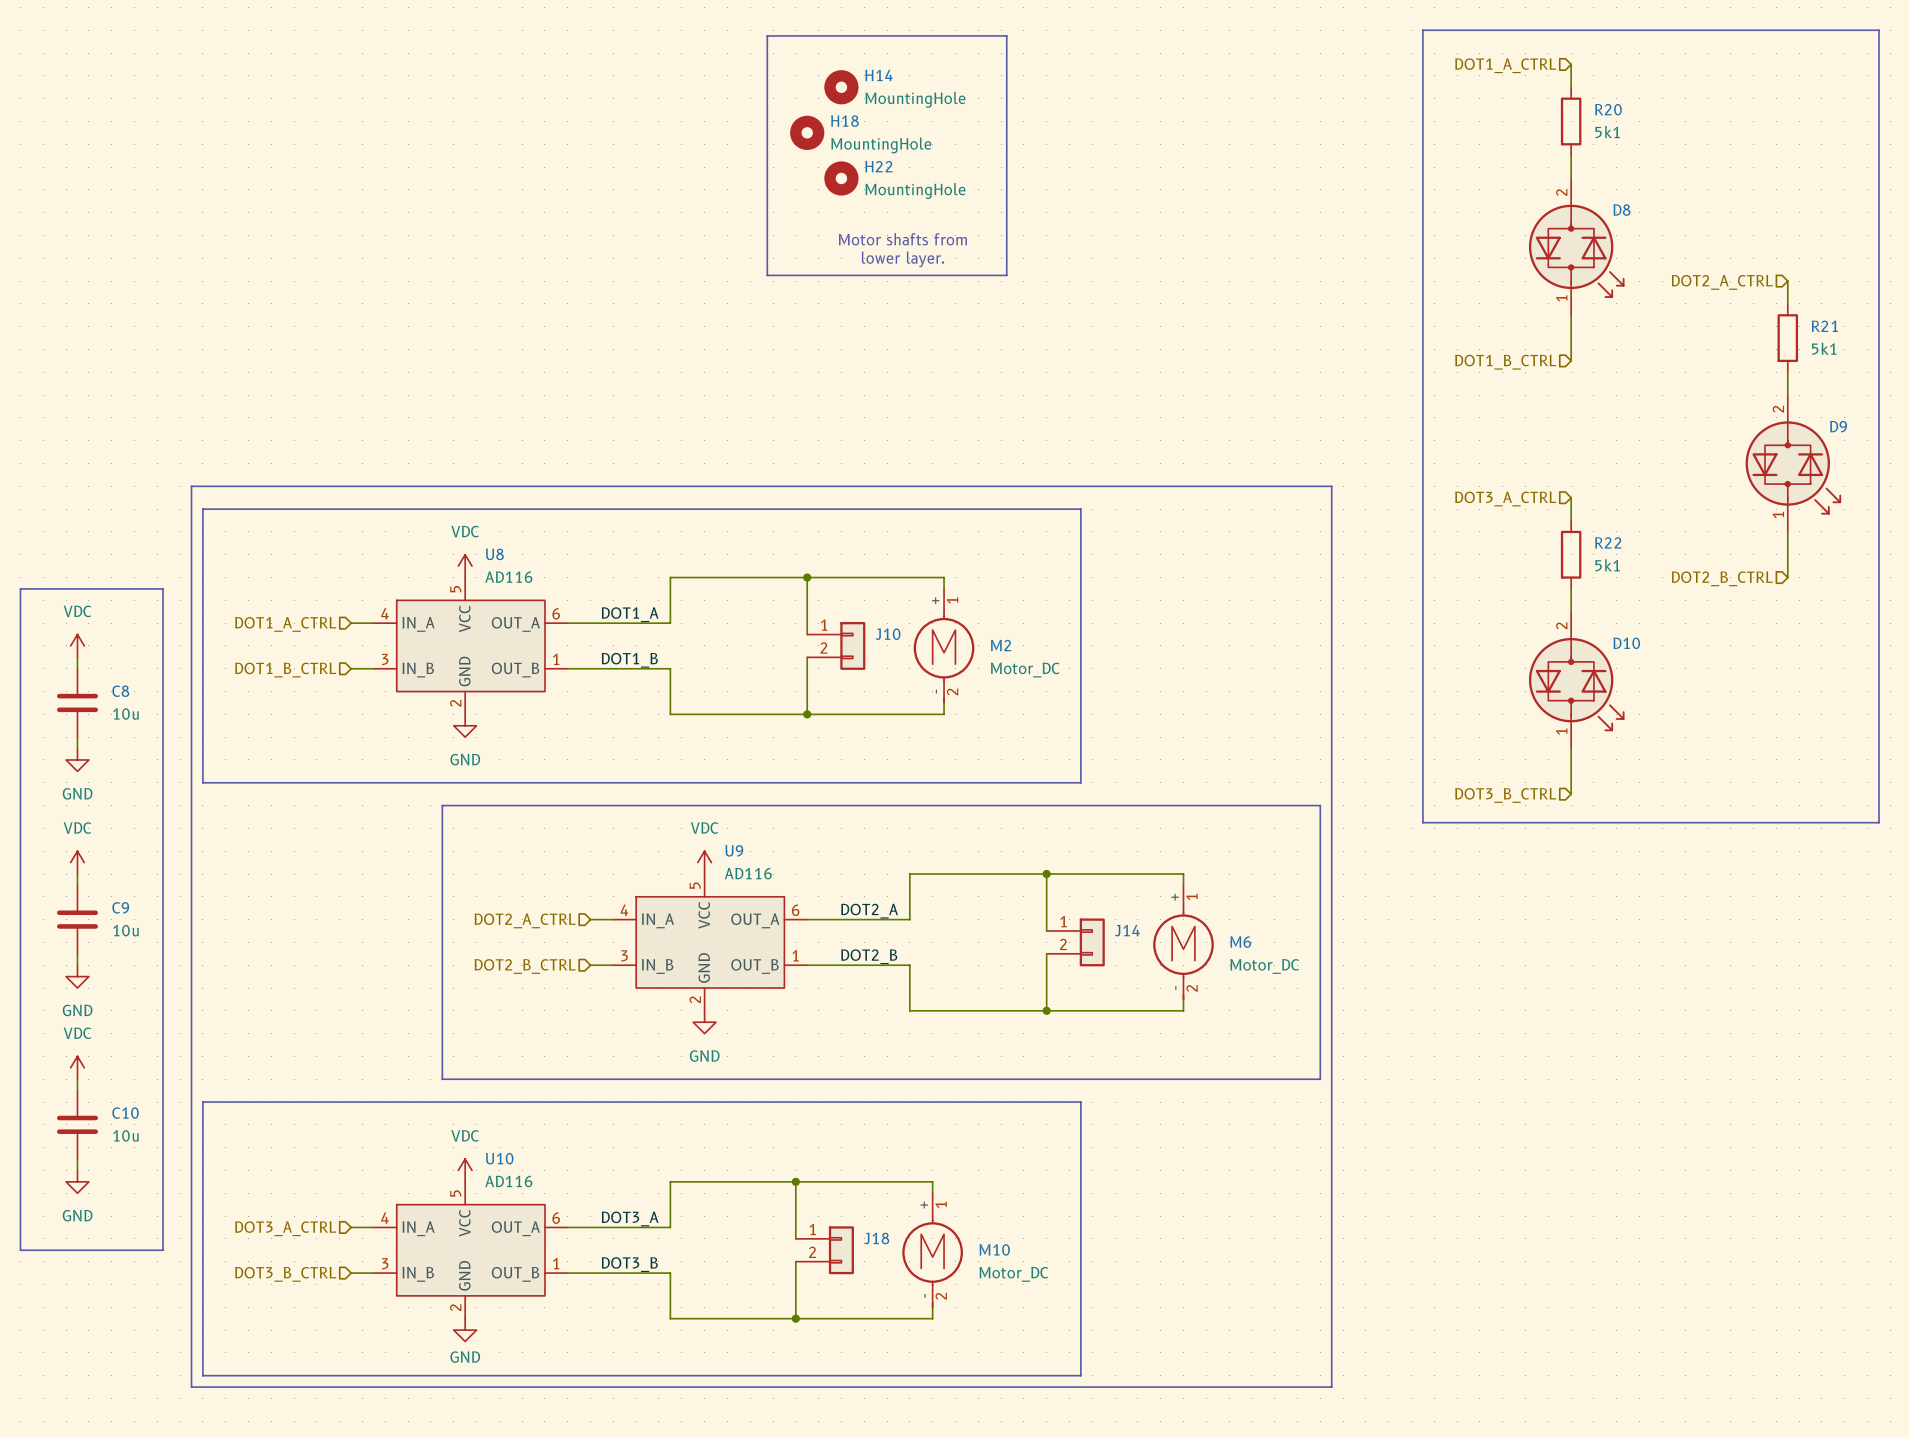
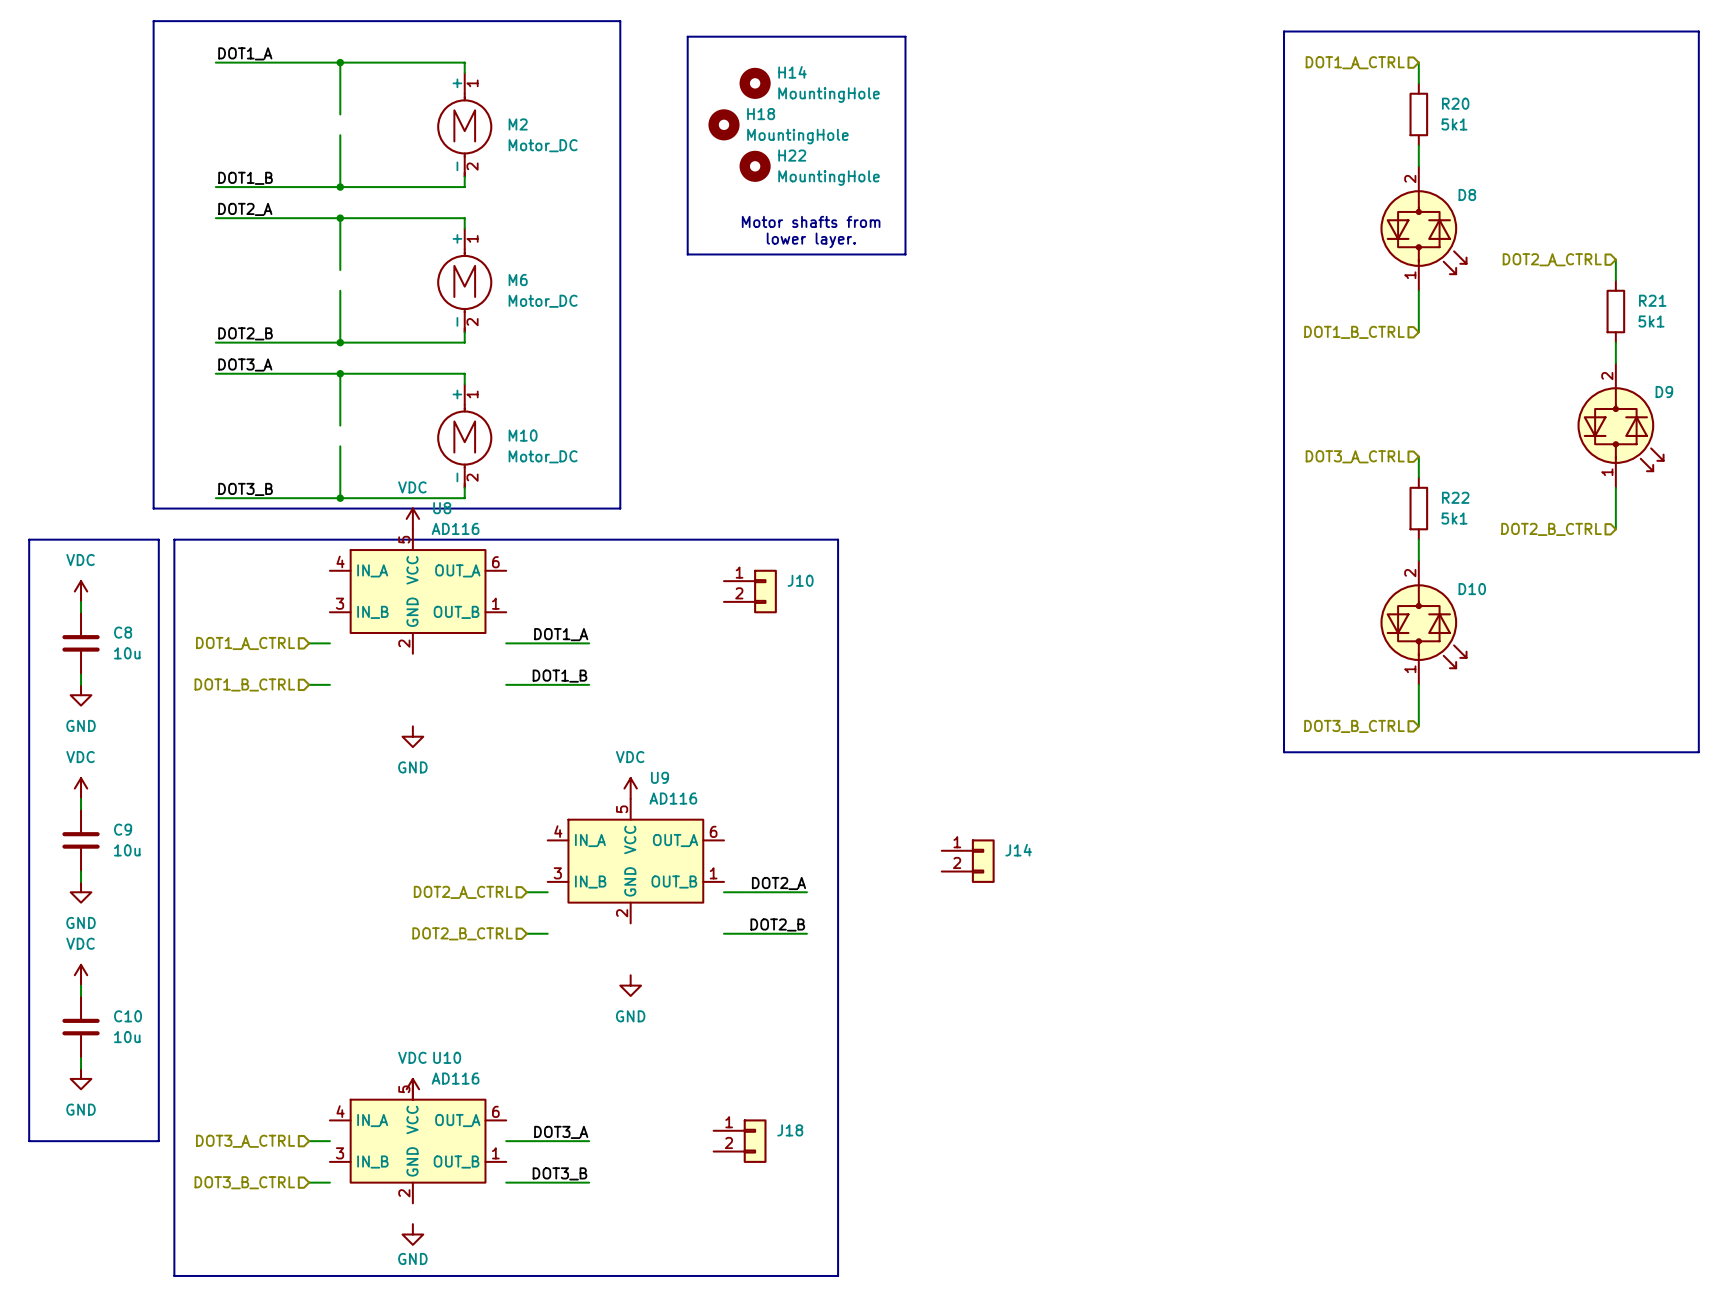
line: none -> (153, 21) (620, 21) (620, 508) (153, 508) (153, 21)
label: none -> DOT1_A (245, 53)
wire: none -> (215, 62) (464, 62) (464, 72)
wire: none -> (340, 62) (340, 114)
junction: none -> (340, 62)
wire: none -> (340, 135) (340, 187)
wire: none -> (464, 176) (464, 187) (215, 187)
label: none -> DOT1_B (245, 178)
junction: none -> (340, 187)
label: none -> DOT2_A (245, 209)
wire: none -> (215, 218) (464, 218) (464, 228)
wire: none -> (340, 218) (340, 270)
junction: none -> (340, 218)
wire: none -> (340, 290) (340, 342)
wire: none -> (464, 332) (464, 342) (215, 342)
label: none -> DOT2_B (245, 333)
junction: none -> (340, 342)
label: none -> DOT3_A (245, 364)
wire: none -> (215, 373) (464, 373) (464, 384)
wire: none -> (340, 373) (340, 425)
junction: none -> (340, 373)
line: (191, 486) (1331, 486) (1331, 1387) (191, 1387) (191, 486) -> none
wire: none -> (340, 446) (340, 498)
wire: none -> (464, 487) (464, 498) (215, 498)
label: none -> DOT3_B (245, 489)
junction: none -> (340, 498)
wire: (807, 577) (807, 634) -> none
junction: (807, 577) -> none
line: (43, 588) (20, 588) (20, 1250) (43, 1250) -> (29, 539) (29, 1141)
line: (163, 588) (163, 1250) -> (138, 539) (158, 539) (158, 1141) (138, 1141)
line: (202, 588) (202, 509) (1080, 509) (1080, 782) (202, 782) -> (174, 1006) (174, 715)
wire: (944, 588) (944, 577) (670, 577) (670, 623) (567, 623) -> none
label position: DOT1_A (630, 614) -> DOT1_A (561, 634)
wire: (351, 623) (373, 623) -> (309, 643) (329, 643)
hierarchical label position: DOT1_A_CTRL (285, 624) -> DOT1_A_CTRL (245, 643)
power symbol position: VDC (77, 645) -> VDC (81, 591)
M2 position: (944, 645) -> (464, 124)
wire: (77, 657) (77, 668) -> (81, 601) (81, 612)
wire: (807, 657) (807, 714) -> none
label position: DOT1_B (629, 660) -> DOT1_B (559, 676)
wire: (351, 668) (373, 668) -> (309, 684) (329, 684)
wire: (567, 668) (670, 668) (670, 714) (944, 714) (944, 702) -> none
hierarchical label position: DOT1_B_CTRL (285, 670) -> DOT1_B_CTRL (244, 684)
C8 position: (77, 702) -> (81, 643)
wire: none -> (506, 643) (589, 643)
junction: (807, 714) -> none
power symbol position: GND (465, 725) -> GND (412, 736)
wire: (77, 737) (77, 748) -> (81, 674) (81, 684)
wire: none -> (506, 684) (589, 684)
power symbol position: GND (77, 759) -> GND (81, 695)
line: (442, 805) (1320, 805) (1320, 1079) (442, 1079) (442, 805) -> none
power symbol position: VDC (77, 862) -> VDC (81, 788)
wire: (77, 874) (77, 885) -> (81, 798) (81, 809)
wire: (1046, 874) (1046, 931) -> none
junction: (1046, 874) -> none
wire: (1183, 885) (1183, 874) (909, 874) (909, 919) (807, 919) -> none
label position: DOT2_A (869, 911) -> DOT2_A (778, 883)
C9 position: (77, 919) -> (81, 840)
wire: (590, 919) (613, 919) -> (526, 892) (547, 892)
hierarchical label position: DOT2_A_CTRL (525, 920) -> DOT2_A_CTRL (463, 892)
M6 position: (1183, 942) -> (464, 280)
wire: (77, 953) (77, 965) -> (81, 871) (81, 881)
wire: (1046, 953) (1046, 1010) -> none
label position: DOT2_B (869, 956) -> DOT2_B (777, 924)
wire: (590, 965) (613, 965) -> (526, 933) (547, 933)
wire: (807, 965) (909, 965) (909, 1010) (1183, 1010) (1183, 999) -> none
hierarchical label position: DOT2_B_CTRL (525, 966) -> DOT2_B_CTRL (462, 933)
power symbol position: GND (77, 976) -> GND (81, 892)
wire: none -> (724, 892) (806, 892)
junction: (1046, 1010) -> none
power symbol position: GND (704, 1022) -> GND (630, 985)
wire: none -> (724, 933) (806, 933)
power symbol position: VDC (77, 1067) -> VDC (81, 975)
wire: (77, 1079) (77, 1090) -> (81, 985) (81, 995)
line: (202, 1102) (1080, 1102) (1080, 1375) (202, 1375) -> (174, 539) (838, 539) (838, 1275) (174, 1275) (174, 1255)
C10 position: (77, 1124) -> (81, 1027)
wire: (77, 1159) (77, 1170) -> (81, 1058) (81, 1068)
power symbol position: VDC (465, 1170) -> VDC (412, 1089)
power symbol position: GND (77, 1181) -> GND (81, 1078)
wire: (795, 1181) (795, 1238) -> none
junction: (795, 1181) -> none
wire: (932, 1193) (932, 1181) (670, 1181) (670, 1227) (567, 1227) -> none
label position: DOT3_A (630, 1218) -> DOT3_A (561, 1132)
wire: (351, 1227) (373, 1227) -> (309, 1141) (329, 1141)
hierarchical label position: DOT3_A_CTRL (285, 1228) -> DOT3_A_CTRL (245, 1141)
wire: none -> (506, 1141) (589, 1141)
M10 position: (932, 1250) -> (464, 435)
wire: (795, 1261) (795, 1318) -> none
label position: DOT3_B (629, 1264) -> DOT3_B (559, 1173)
wire: (351, 1273) (373, 1273) -> (309, 1182) (329, 1182)
wire: (567, 1273) (670, 1273) (670, 1318) (932, 1318) (932, 1307) -> none
hierarchical label position: DOT3_B_CTRL (285, 1274) -> DOT3_B_CTRL (244, 1182)
wire: none -> (506, 1182) (589, 1182)
junction: (795, 1318) -> none
power symbol position: GND (465, 1330) -> GND (412, 1234)

